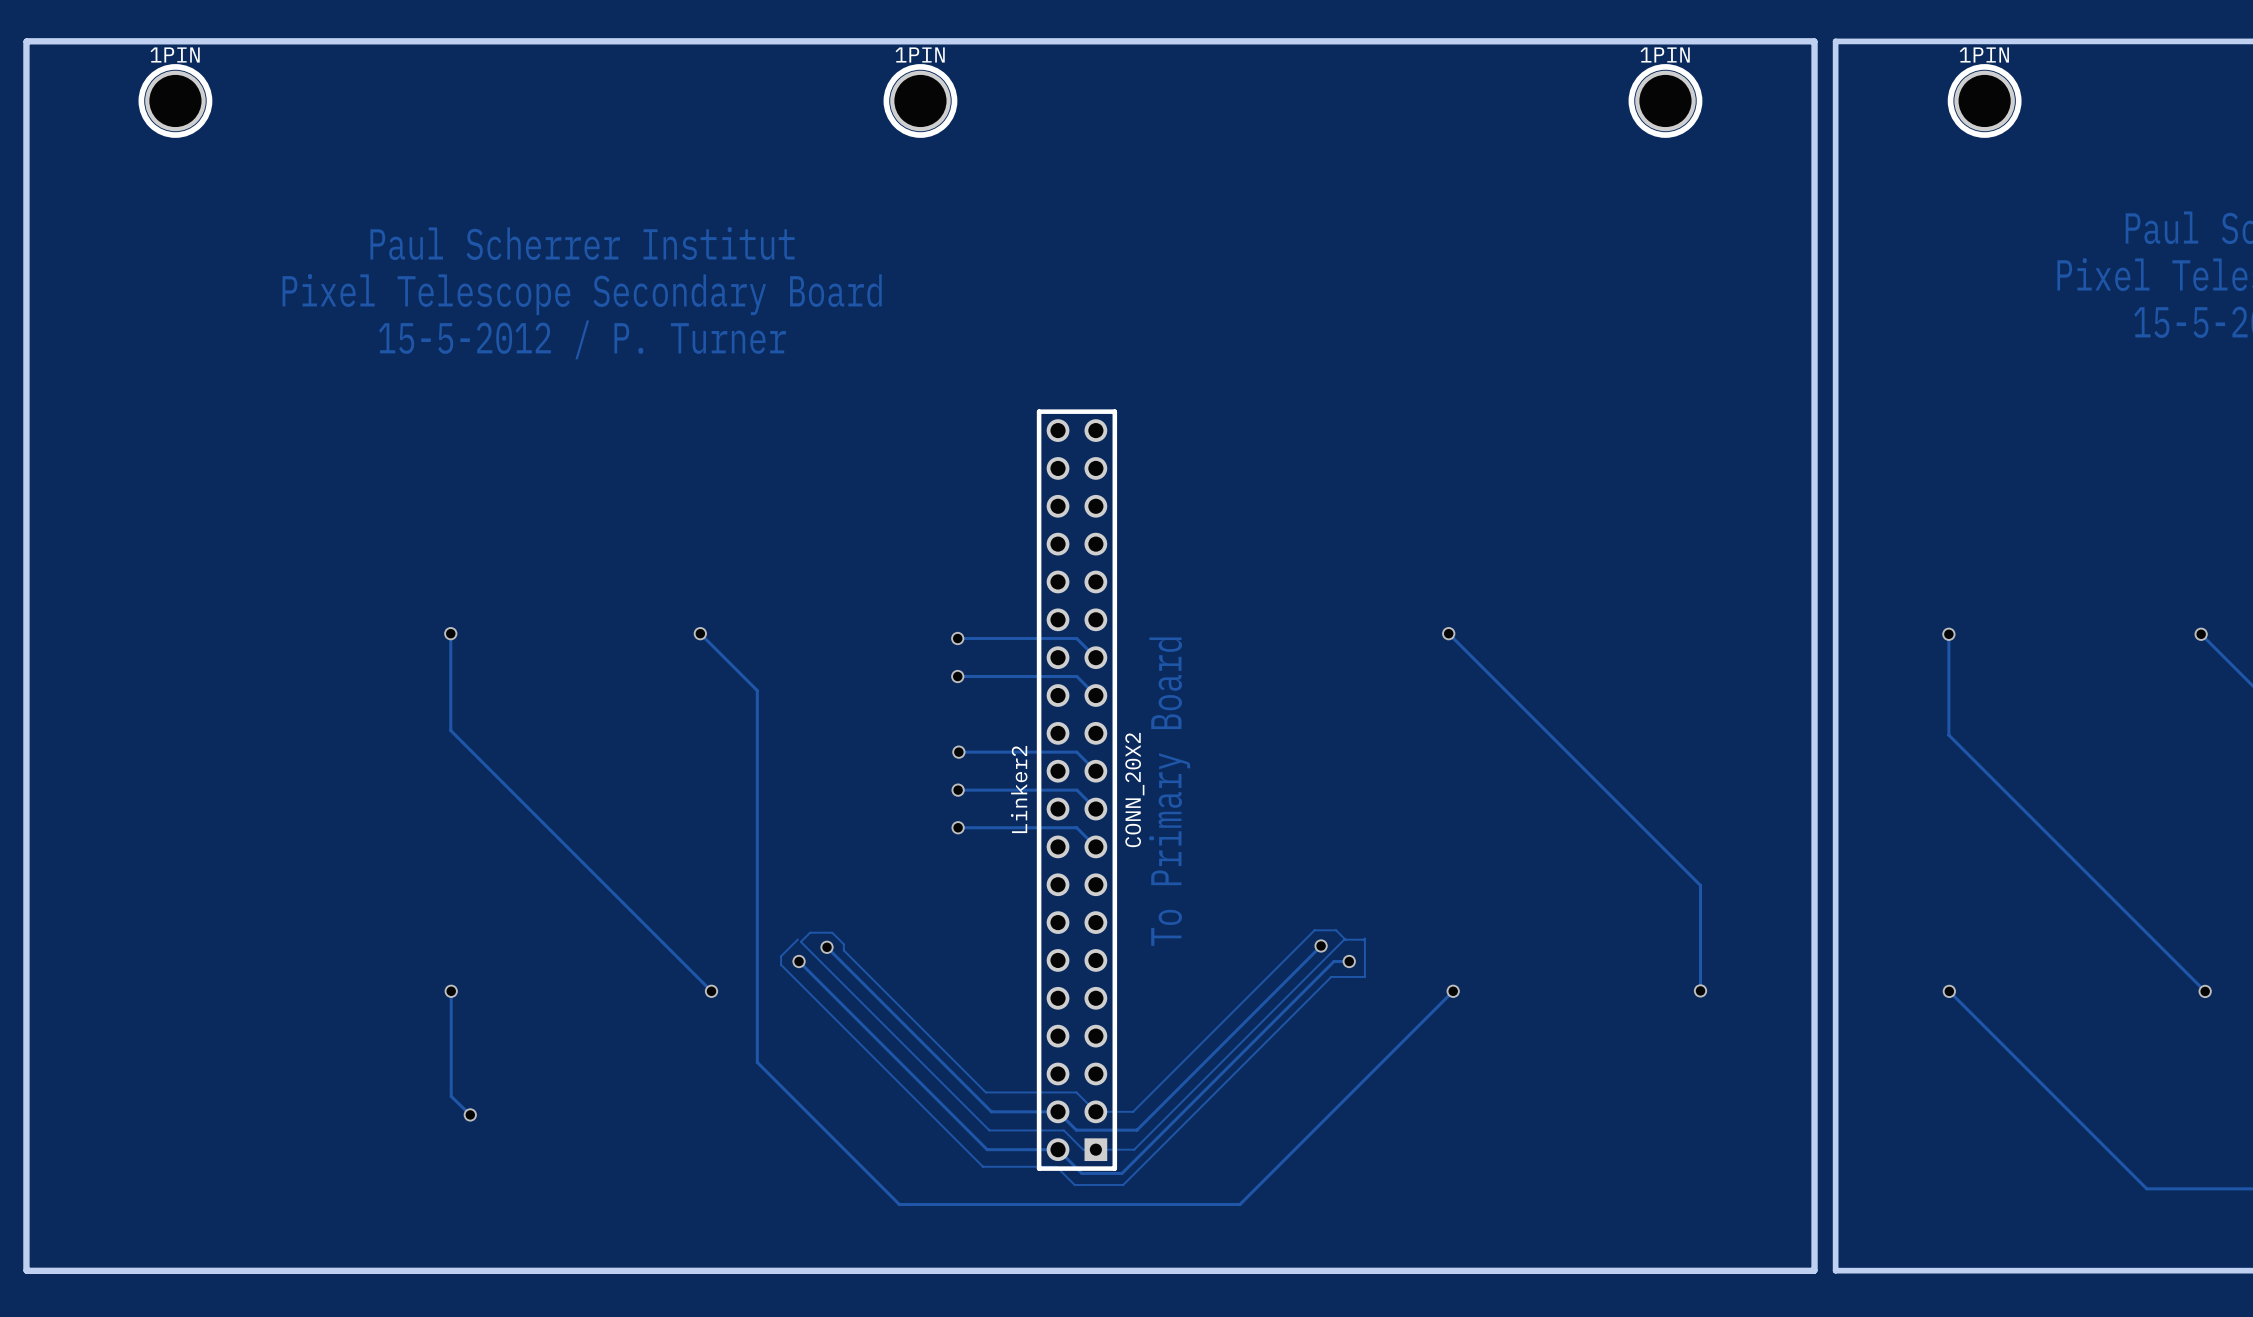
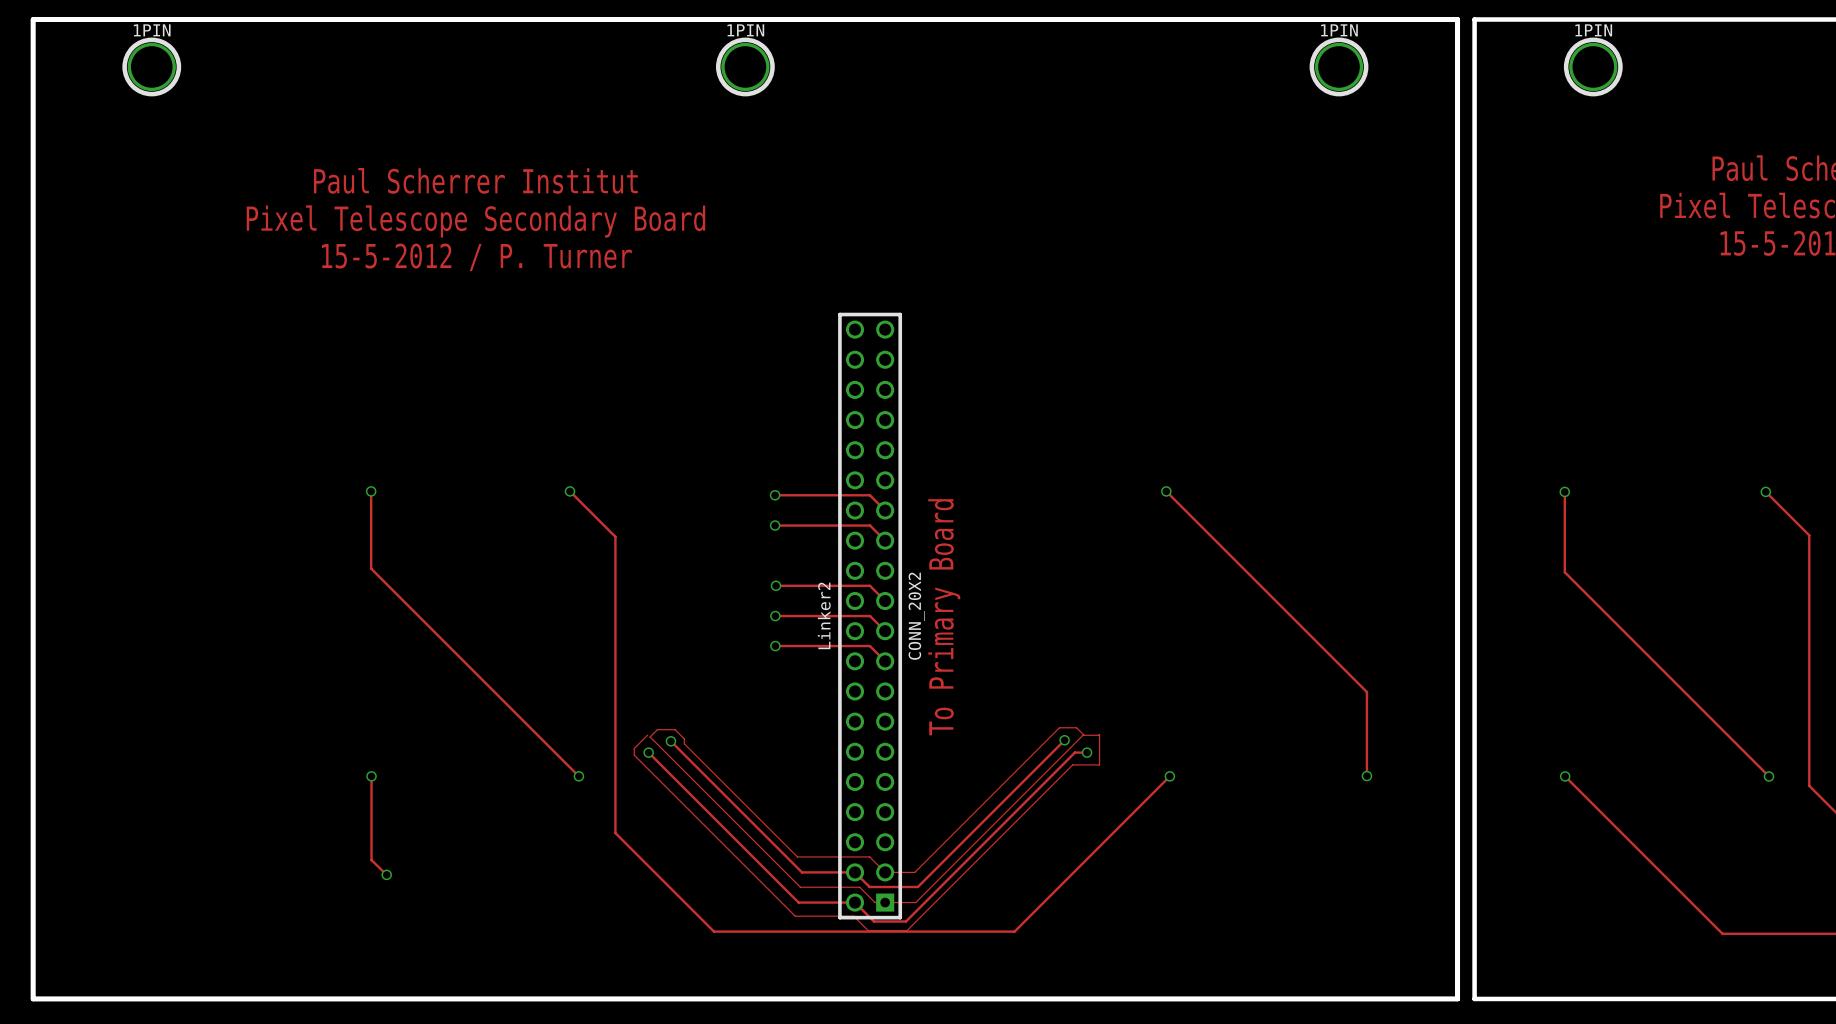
track: (881, 1186) (899, 1204) (1240, 1204) (1258, 1186) -> (713, 931) (1014, 931)

